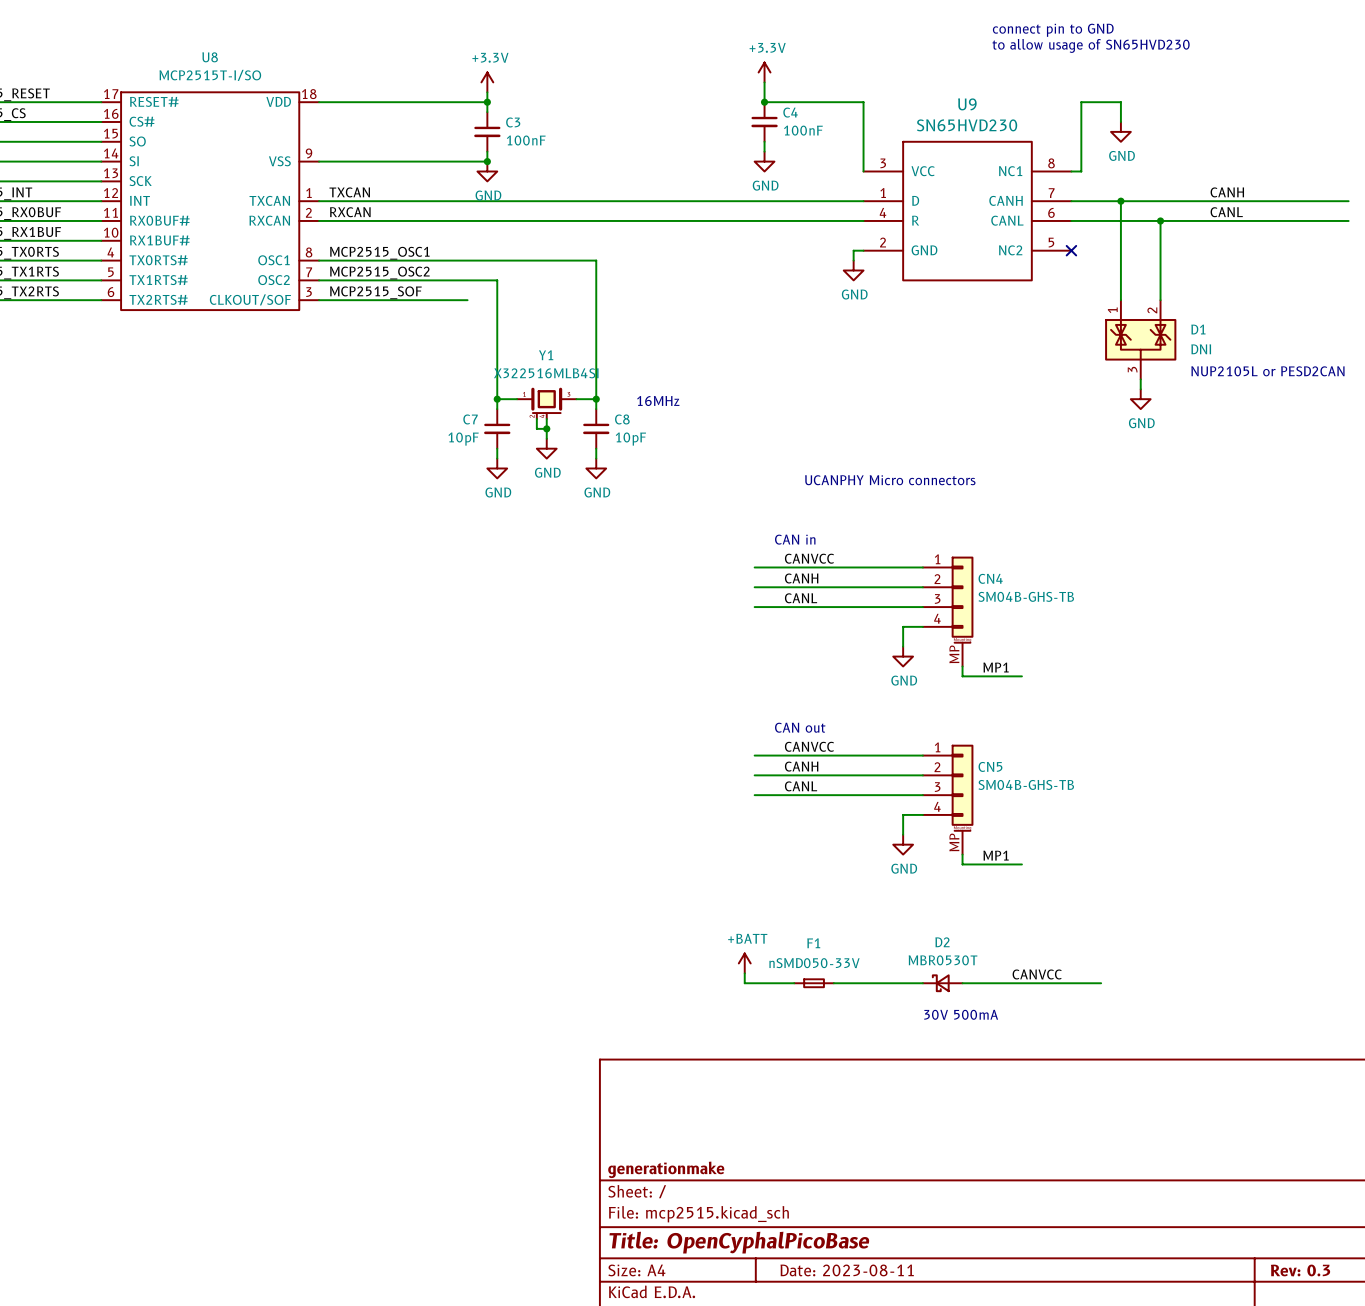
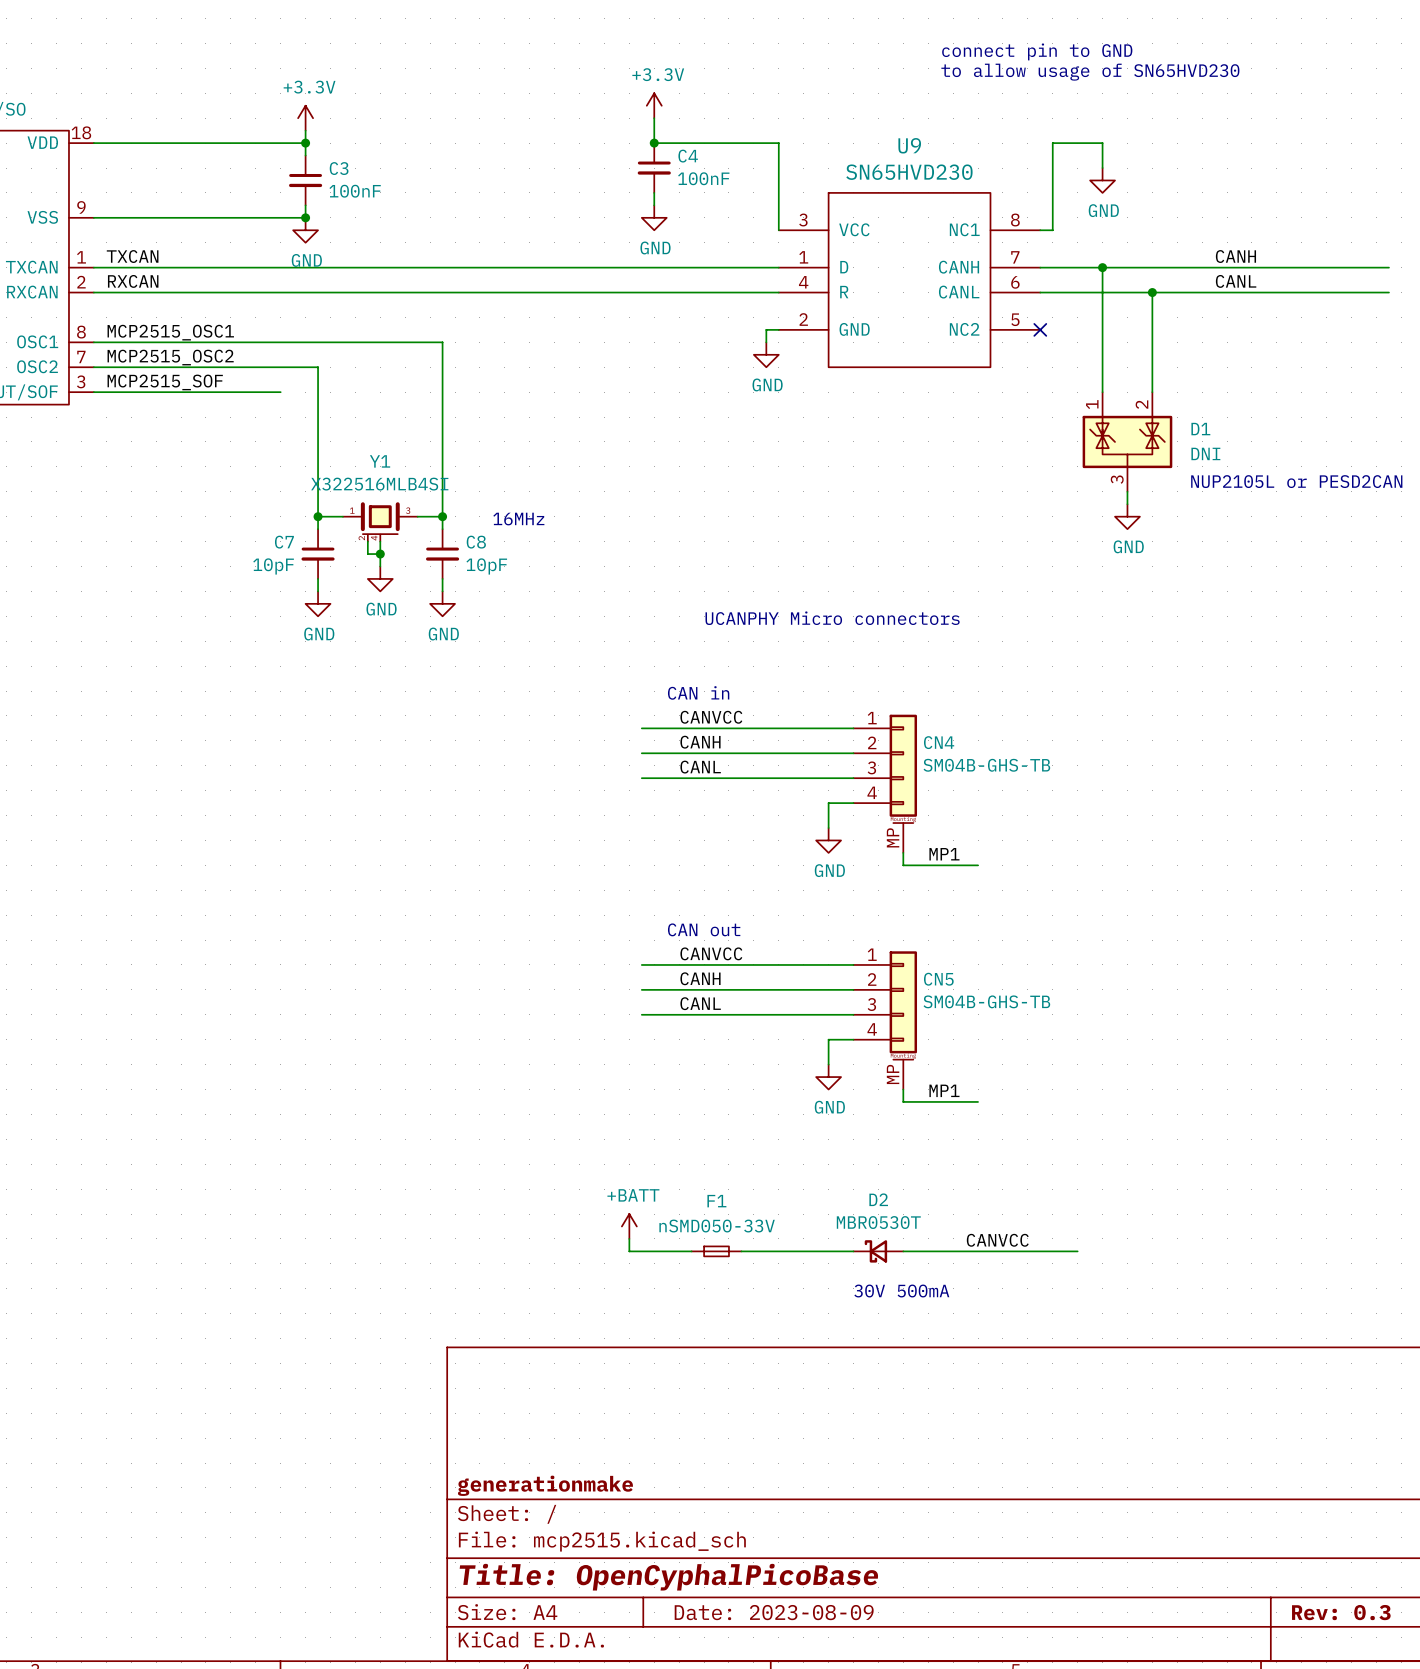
title block: Date: 2023-08-11 (847, 1270) -> Date: 2023-08-09 (774, 1612)

